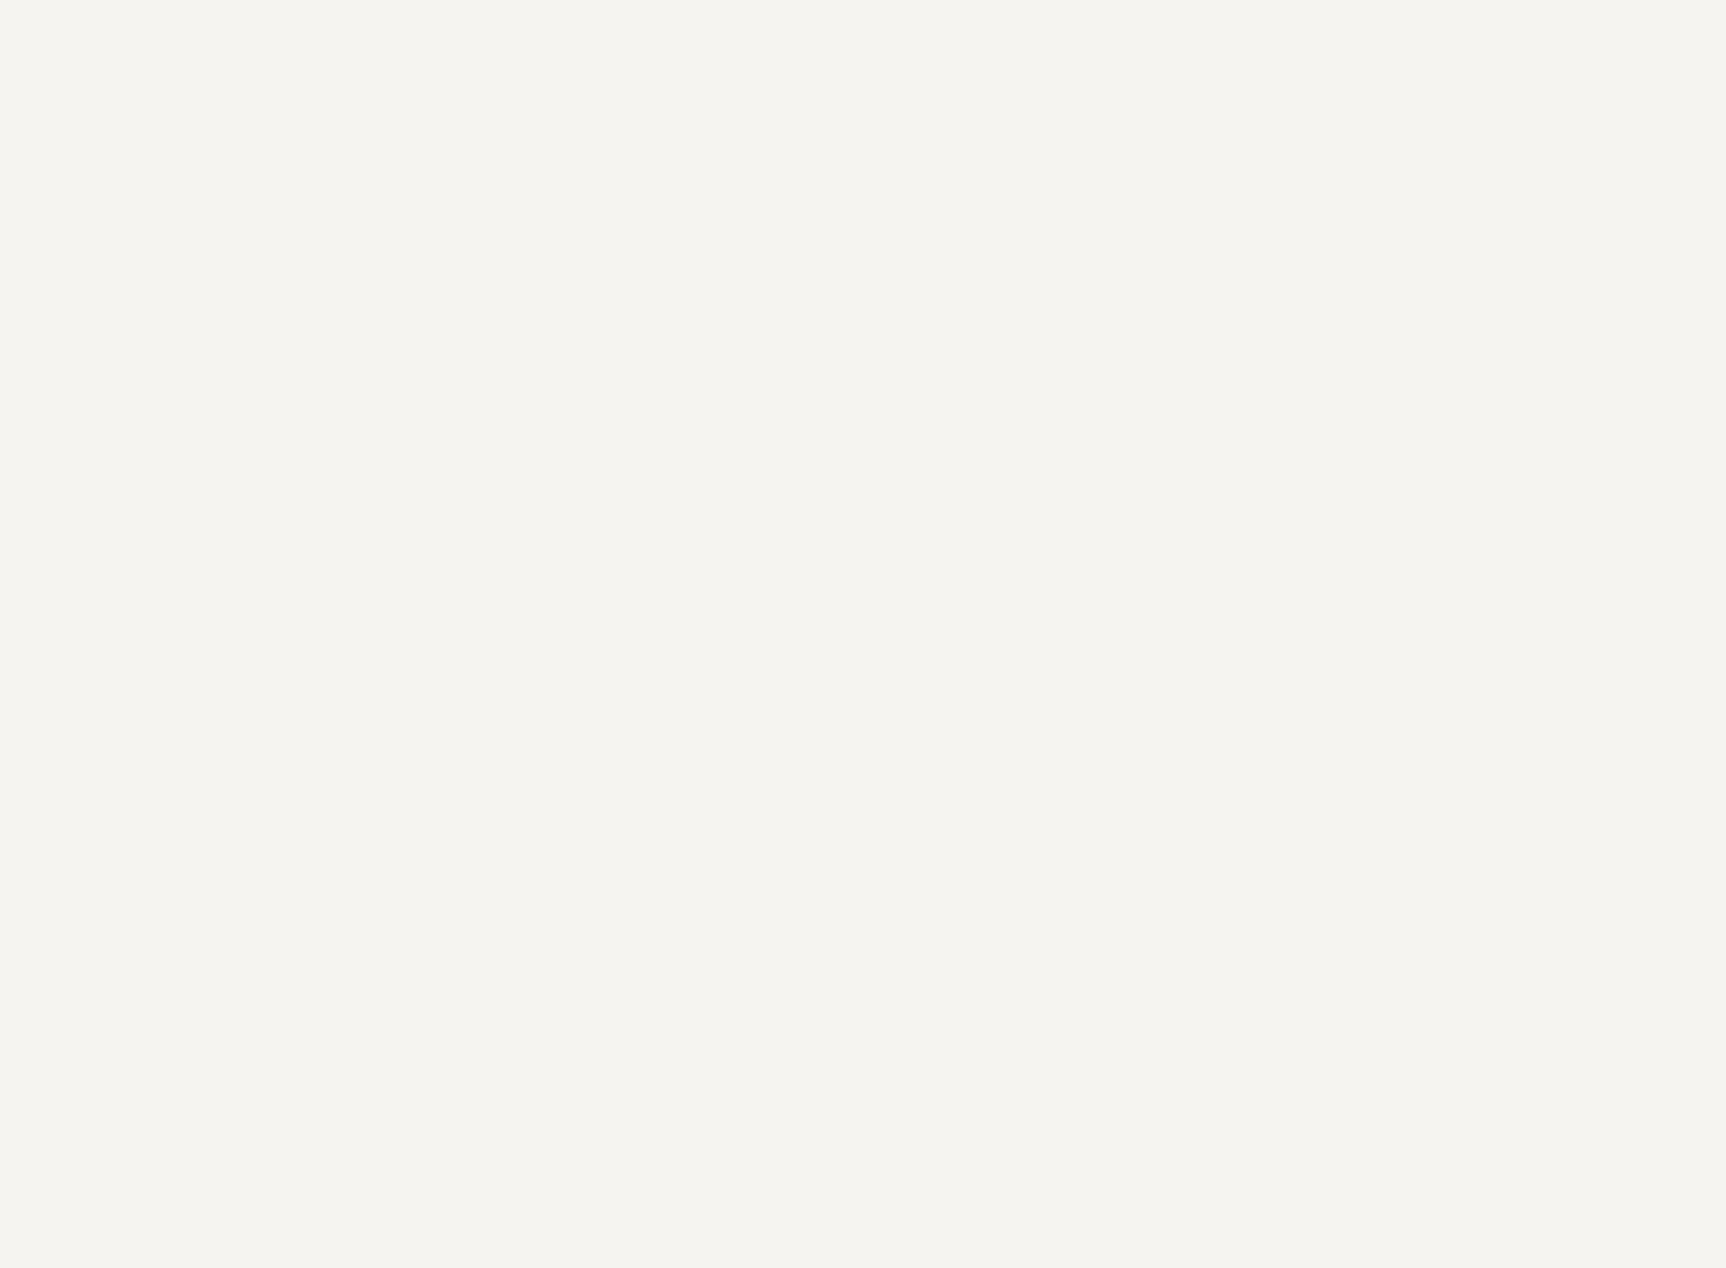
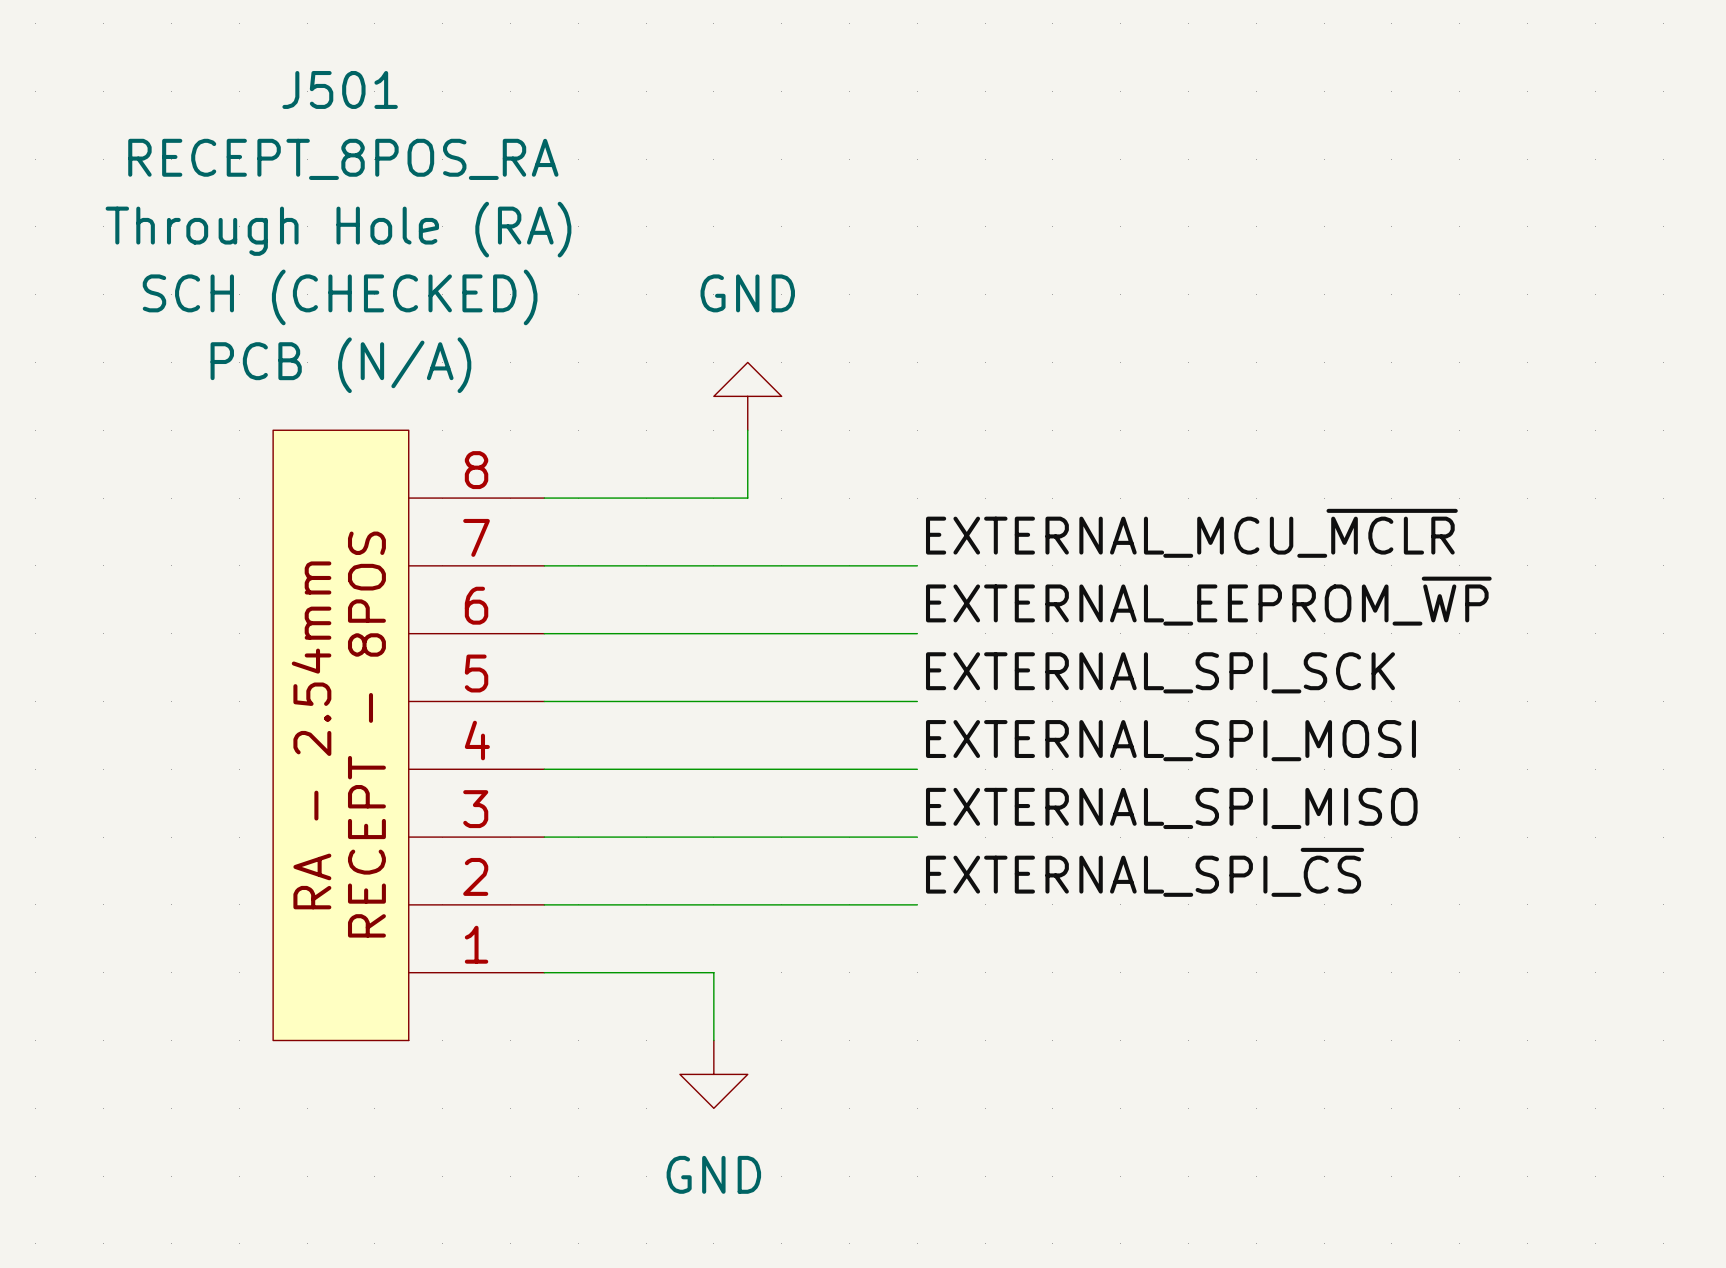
power symbol: none -> GND (747, 396)
wire: none -> (747, 430) (747, 498) (544, 498)
label: none -> EXTERNAL_MCU_~{MCLR} (1191, 533)
wire: none -> (544, 565) (917, 565)
label: none -> EXTERNAL_EEPROM_~{WP} (1208, 601)
wire: none -> (544, 633) (917, 633)
label: none -> EXTERNAL_SPI_SCK (1160, 672)
wire: none -> (544, 701) (917, 701)
J501: none -> RECEPT_8POS_RA (408, 735)
label: none -> EXTERNAL_SPI_MOSI (1170, 740)
wire: none -> (544, 769) (917, 769)
label: none -> EXTERNAL_SPI_MISO (1171, 808)
wire: none -> (544, 837) (917, 837)
label: none -> EXTERNAL_SPI_~{CS} (1145, 872)
wire: none -> (544, 904) (917, 904)
wire: none -> (544, 972) (713, 972) (713, 1040)
power symbol: none -> GND (713, 1074)

